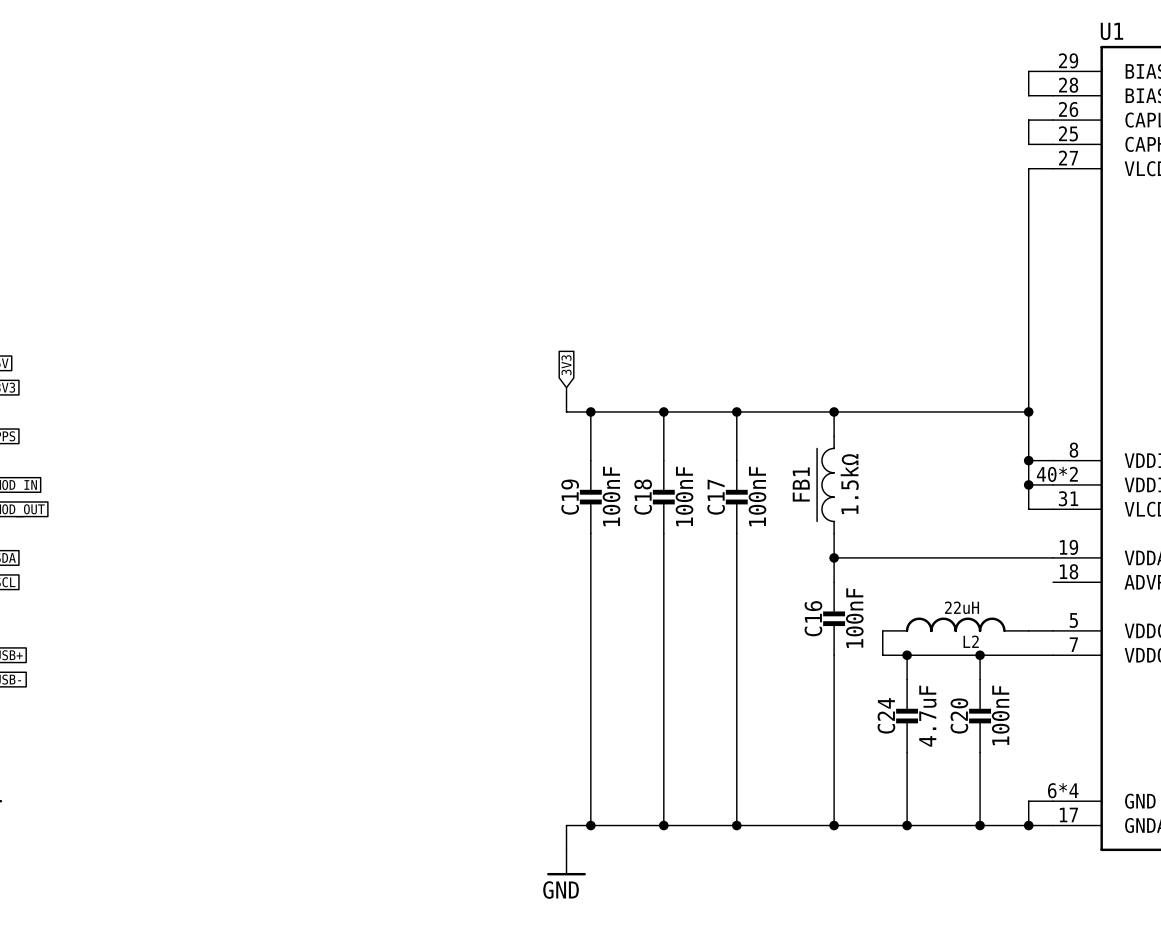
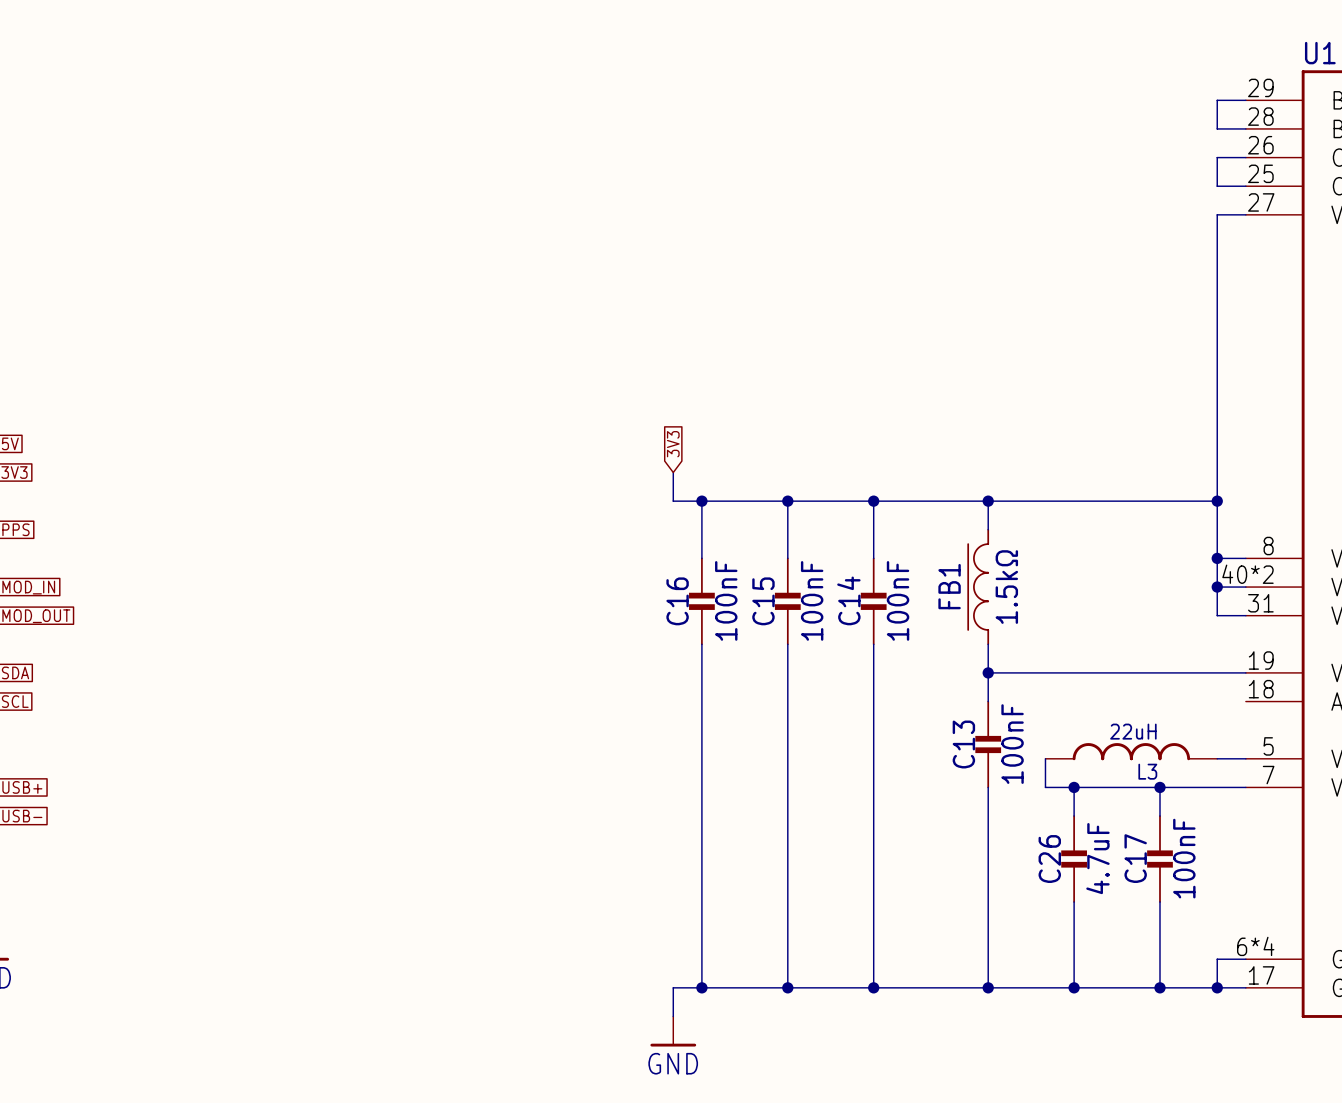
C19 name: C19 (570, 497) -> C16 (677, 601)
C18 name: C18 (643, 497) -> C15 (763, 601)
C17 name: C17 (716, 497) -> C14 (848, 600)
C16 name: C16 (813, 618) -> C13 (963, 744)
L2 name: L2 (971, 641) -> L3 (1147, 771)
C24 name: C24 (886, 715) -> C26 (1049, 859)
C20 name: C20 (959, 716) -> C17 (1135, 858)

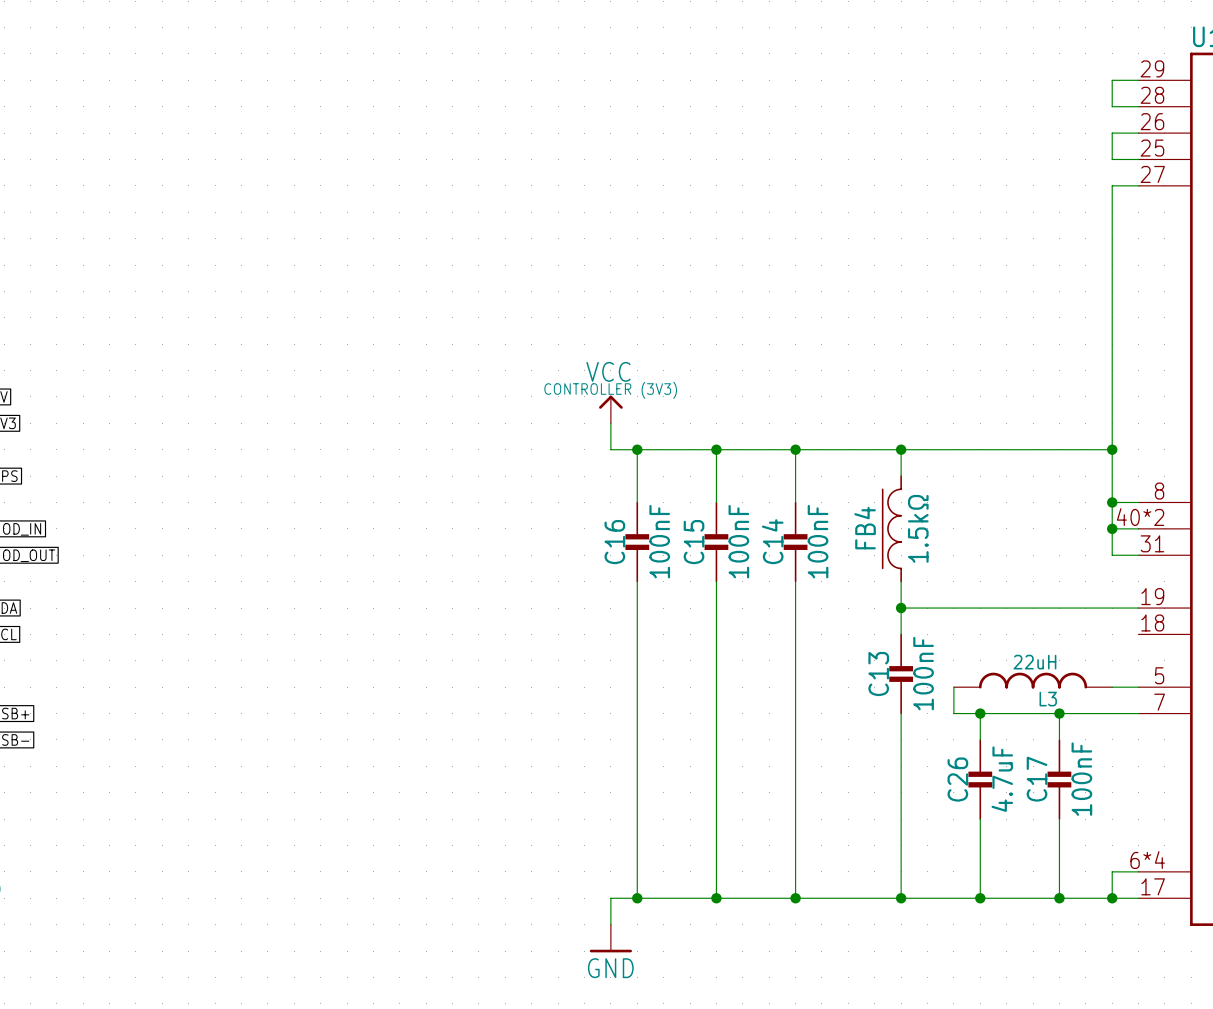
global label: 3V3 (673, 444) -> none
power symbol: none -> (610, 409)
FB1 name: FB1 (949, 586) -> FB4 (865, 528)

